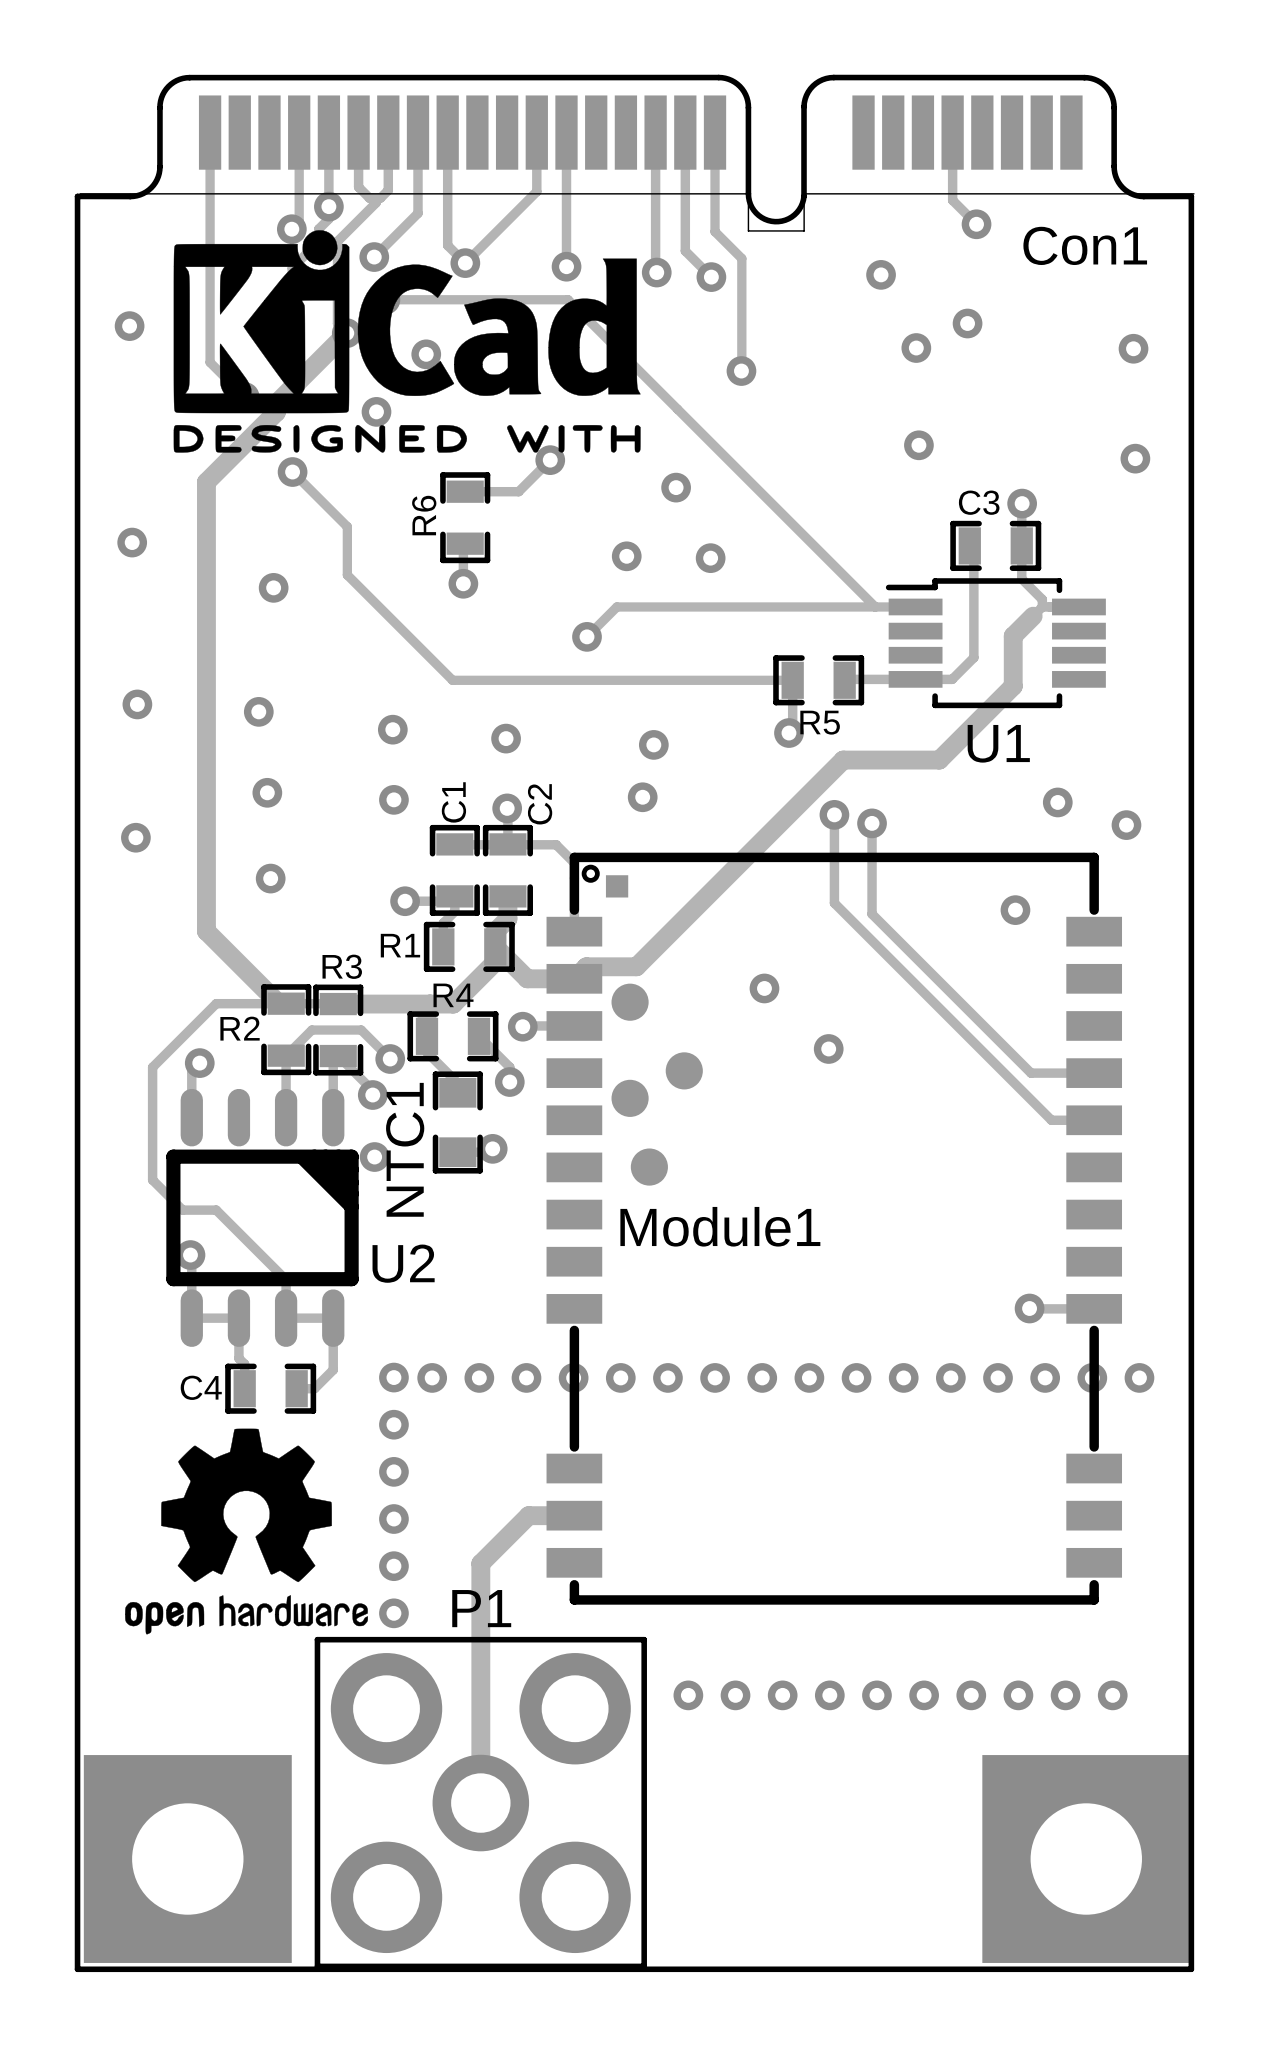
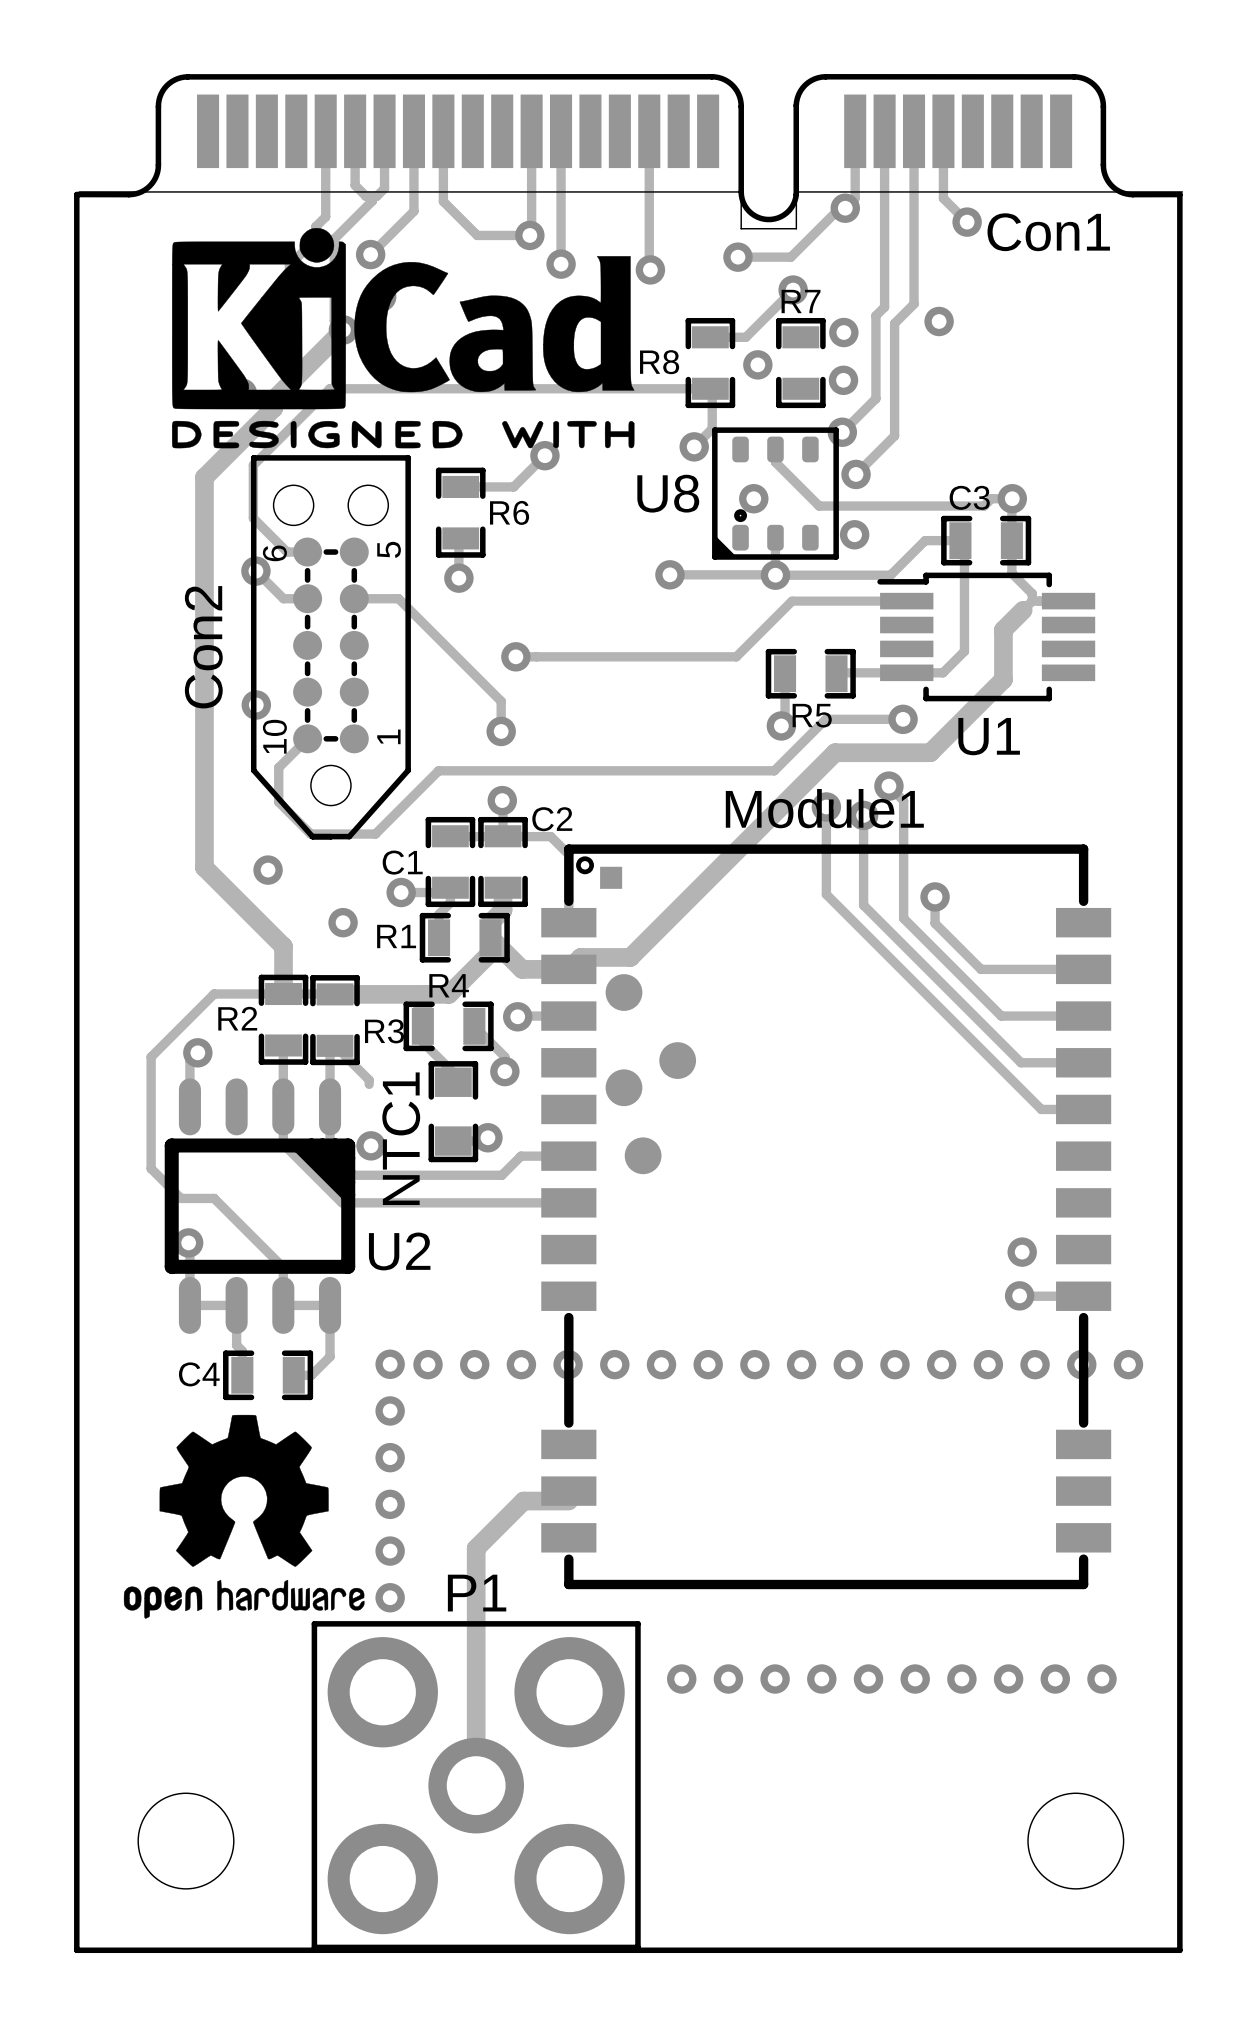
Con1 footprint: [79, 95, 1195, 1963] -> [79, 94, 1183, 1889]
track: (210, 132) (210, 362) (244, 397) -> none
track: (299, 132) (299, 221) (291, 229) -> none
track: (685, 132) (685, 251) (711, 277) -> none
track: (715, 132) (715, 231) (741, 258) (741, 370) -> none
track: none -> (855, 131) (855, 198) (845, 208) (839, 208) (790, 257) (737, 257)
track: none -> (884, 131) (884, 307) (875, 315) (875, 398) (842, 432)
track: none -> (914, 131) (914, 304) (894, 323) (894, 435) (856, 474)
track: (536, 191) (465, 263) (447, 245) (447, 203) -> (531, 189) (531, 233) (529, 235) (477, 235) (443, 201)
via: (328, 206) -> none
via: none -> (845, 208)
via: (291, 229) -> none
via position: (465, 263) -> (529, 235)
via: (881, 274) -> none
via position: (711, 277) -> (737, 257)
track: none -> (793, 290) (745, 337) (710, 337)
via: none -> (793, 290)
track: (385, 299) (568, 299) (875, 606) -> none
via position: (967, 323) -> (939, 321)
via: (129, 326) -> none
via: none -> (843, 332)
via: (916, 348) -> none
via: (1133, 348) -> none
via: (426, 354) -> none
R8: none -> (710, 363)
R7: none -> (800, 363)
via position: (741, 371) -> (757, 364)
via: none -> (843, 380)
via: (376, 411) -> none
via: none -> (842, 432)
via: (918, 445) -> none
track: none -> (694, 446) (712, 428) (712, 390) (710, 388) (329, 388) (253, 465) (253, 518) (287, 552) (307, 552)
via: none -> (694, 446)
track: none -> (775, 449) (775, 462) (819, 506) (984, 506) (991, 498) (1012, 498)
via: (1135, 458) -> none
track: (292, 472) (347, 526) (347, 575) (452, 680) (792, 680) -> none
via: (292, 472) -> none
via: none -> (856, 474)
via: (676, 487) -> none
U8: none -> (775, 493)
via: none -> (753, 498)
R6 name rotation: 0° (424, 515) -> 90° clockwise (509, 512)
R6 name position: R6 (424, 515) -> R6 (509, 512)
via: none -> (854, 534)
via: (132, 542) -> none
track: none -> (775, 537) (775, 575) (890, 575) (925, 540) (960, 540)
via: (626, 556) -> none
via: (710, 558) -> none
track: none -> (255, 571) (283, 598) (307, 598)
track: none -> (669, 574) (775, 574)
via: none -> (669, 574)
via: none -> (775, 575)
via position: (273, 587) -> (255, 571)
track: none -> (354, 598) (398, 598) (501, 701) (501, 731)
track: (799, 606) (616, 606) (587, 636) -> (792, 601) (736, 656) (515, 656)
via: (587, 636) -> none
Con2: none -> (330, 647)
via: none -> (515, 656)
via: (137, 704) -> none
track: none -> (903, 719) (825, 719) (774, 770) (438, 770) (375, 834) (310, 834) (278, 802) (278, 767) (307, 738)
via: none -> (903, 719)
via: (392, 729) -> none
via: (653, 744) -> none
via: (267, 792) -> none
track: none -> (888, 786) (903, 800) (903, 918) (1001, 1016) (1083, 1016)
via: none -> (888, 786)
via: (642, 797) -> none
via: (393, 799) -> none
C1 name rotation: 0° (453, 802) -> 90° clockwise (402, 862)
C1 name position: C1 (453, 802) -> C1 (402, 862)
via: (1057, 802) -> none
C2 name rotation: 0° (540, 804) -> 90° clockwise (552, 819)
via: (1126, 825) -> none
via: (135, 837) -> none
Module1 footprint: [546, 852, 1123, 1605] -> [541, 844, 1112, 1590]
track: (206, 875) (206, 931) (278, 1003) (286, 1003) -> (204, 867) (283, 946) (283, 994)
track: none -> (935, 896) (935, 923) (981, 969) (1083, 969)
via position: (1015, 910) -> (935, 896)
via: none -> (343, 922)
R3 name position: R3 (342, 966) -> R3 (384, 1031)
via: (764, 988) -> none
via: (828, 1048) -> none
track: (286, 1055) (311, 1030) (361, 1030) (390, 1059) -> none
via: (390, 1059) -> none
via: (372, 1095) -> none
track: none -> (283, 1106) (283, 1144) (341, 1202) (568, 1202)
track: none -> (330, 1106) (330, 1156) (348, 1175) (501, 1175) (521, 1156) (568, 1156)
Module1 name position: Module1 (720, 1226) -> Module1 (824, 808)
via: none -> (1022, 1252)

